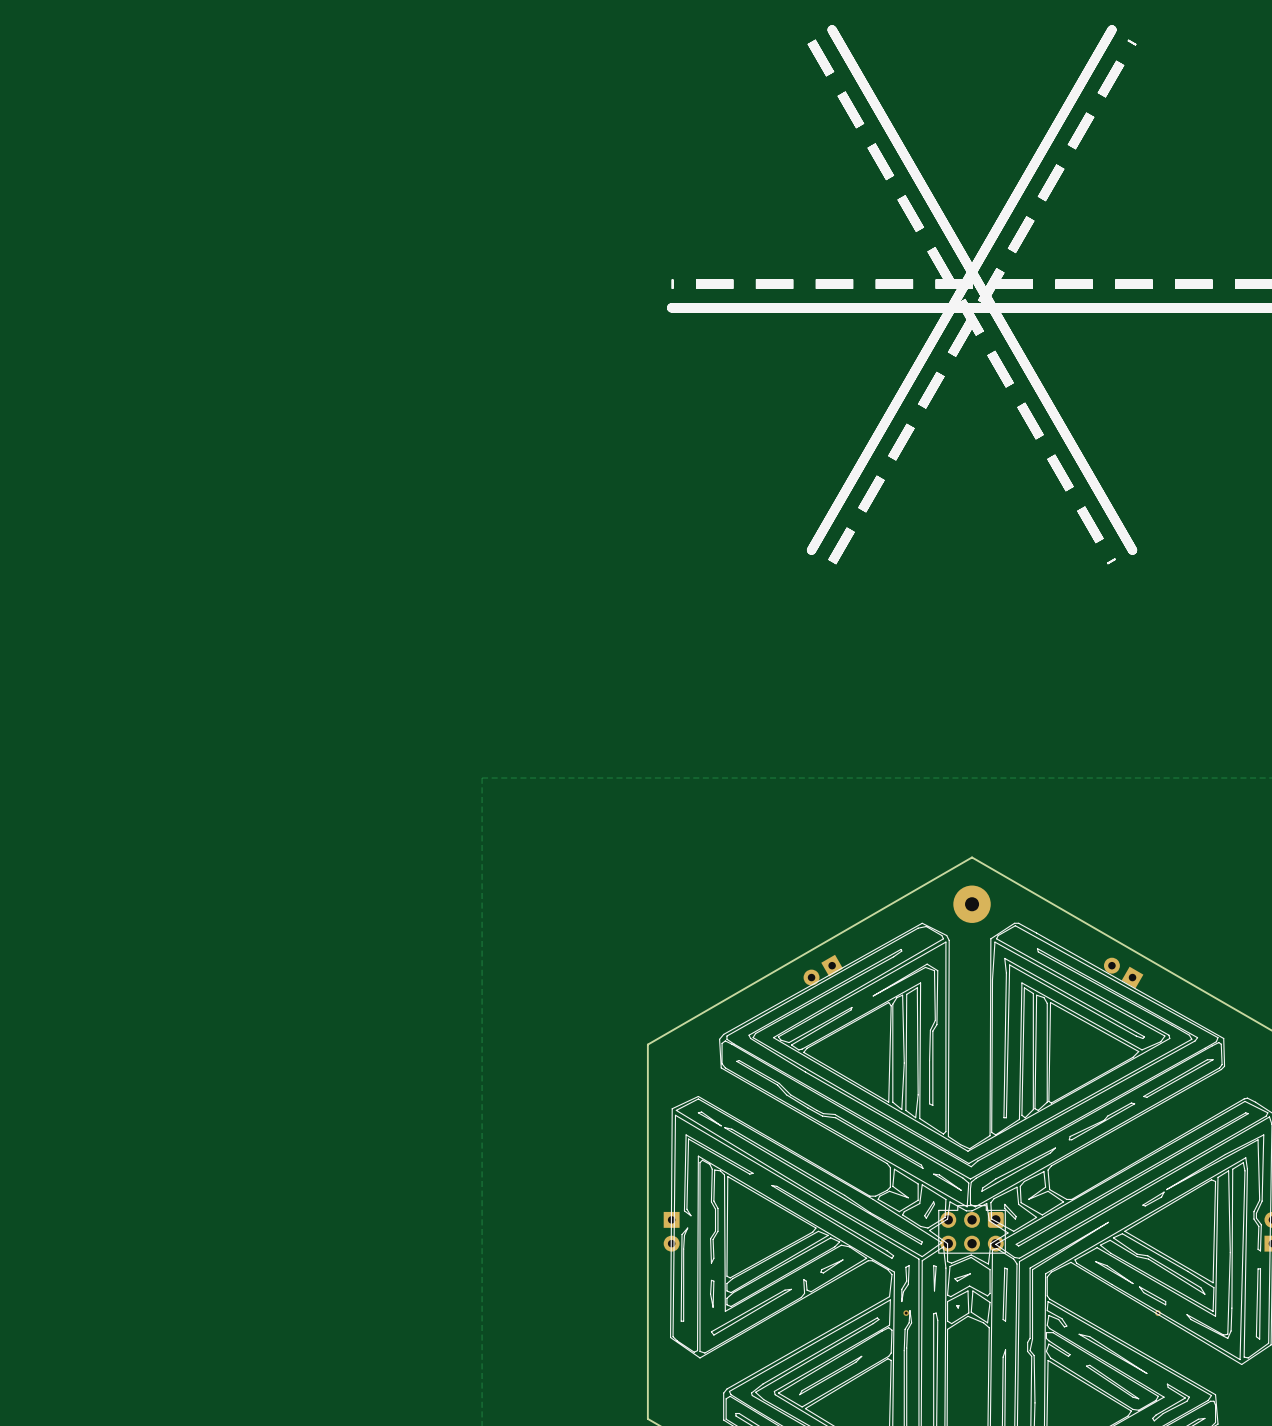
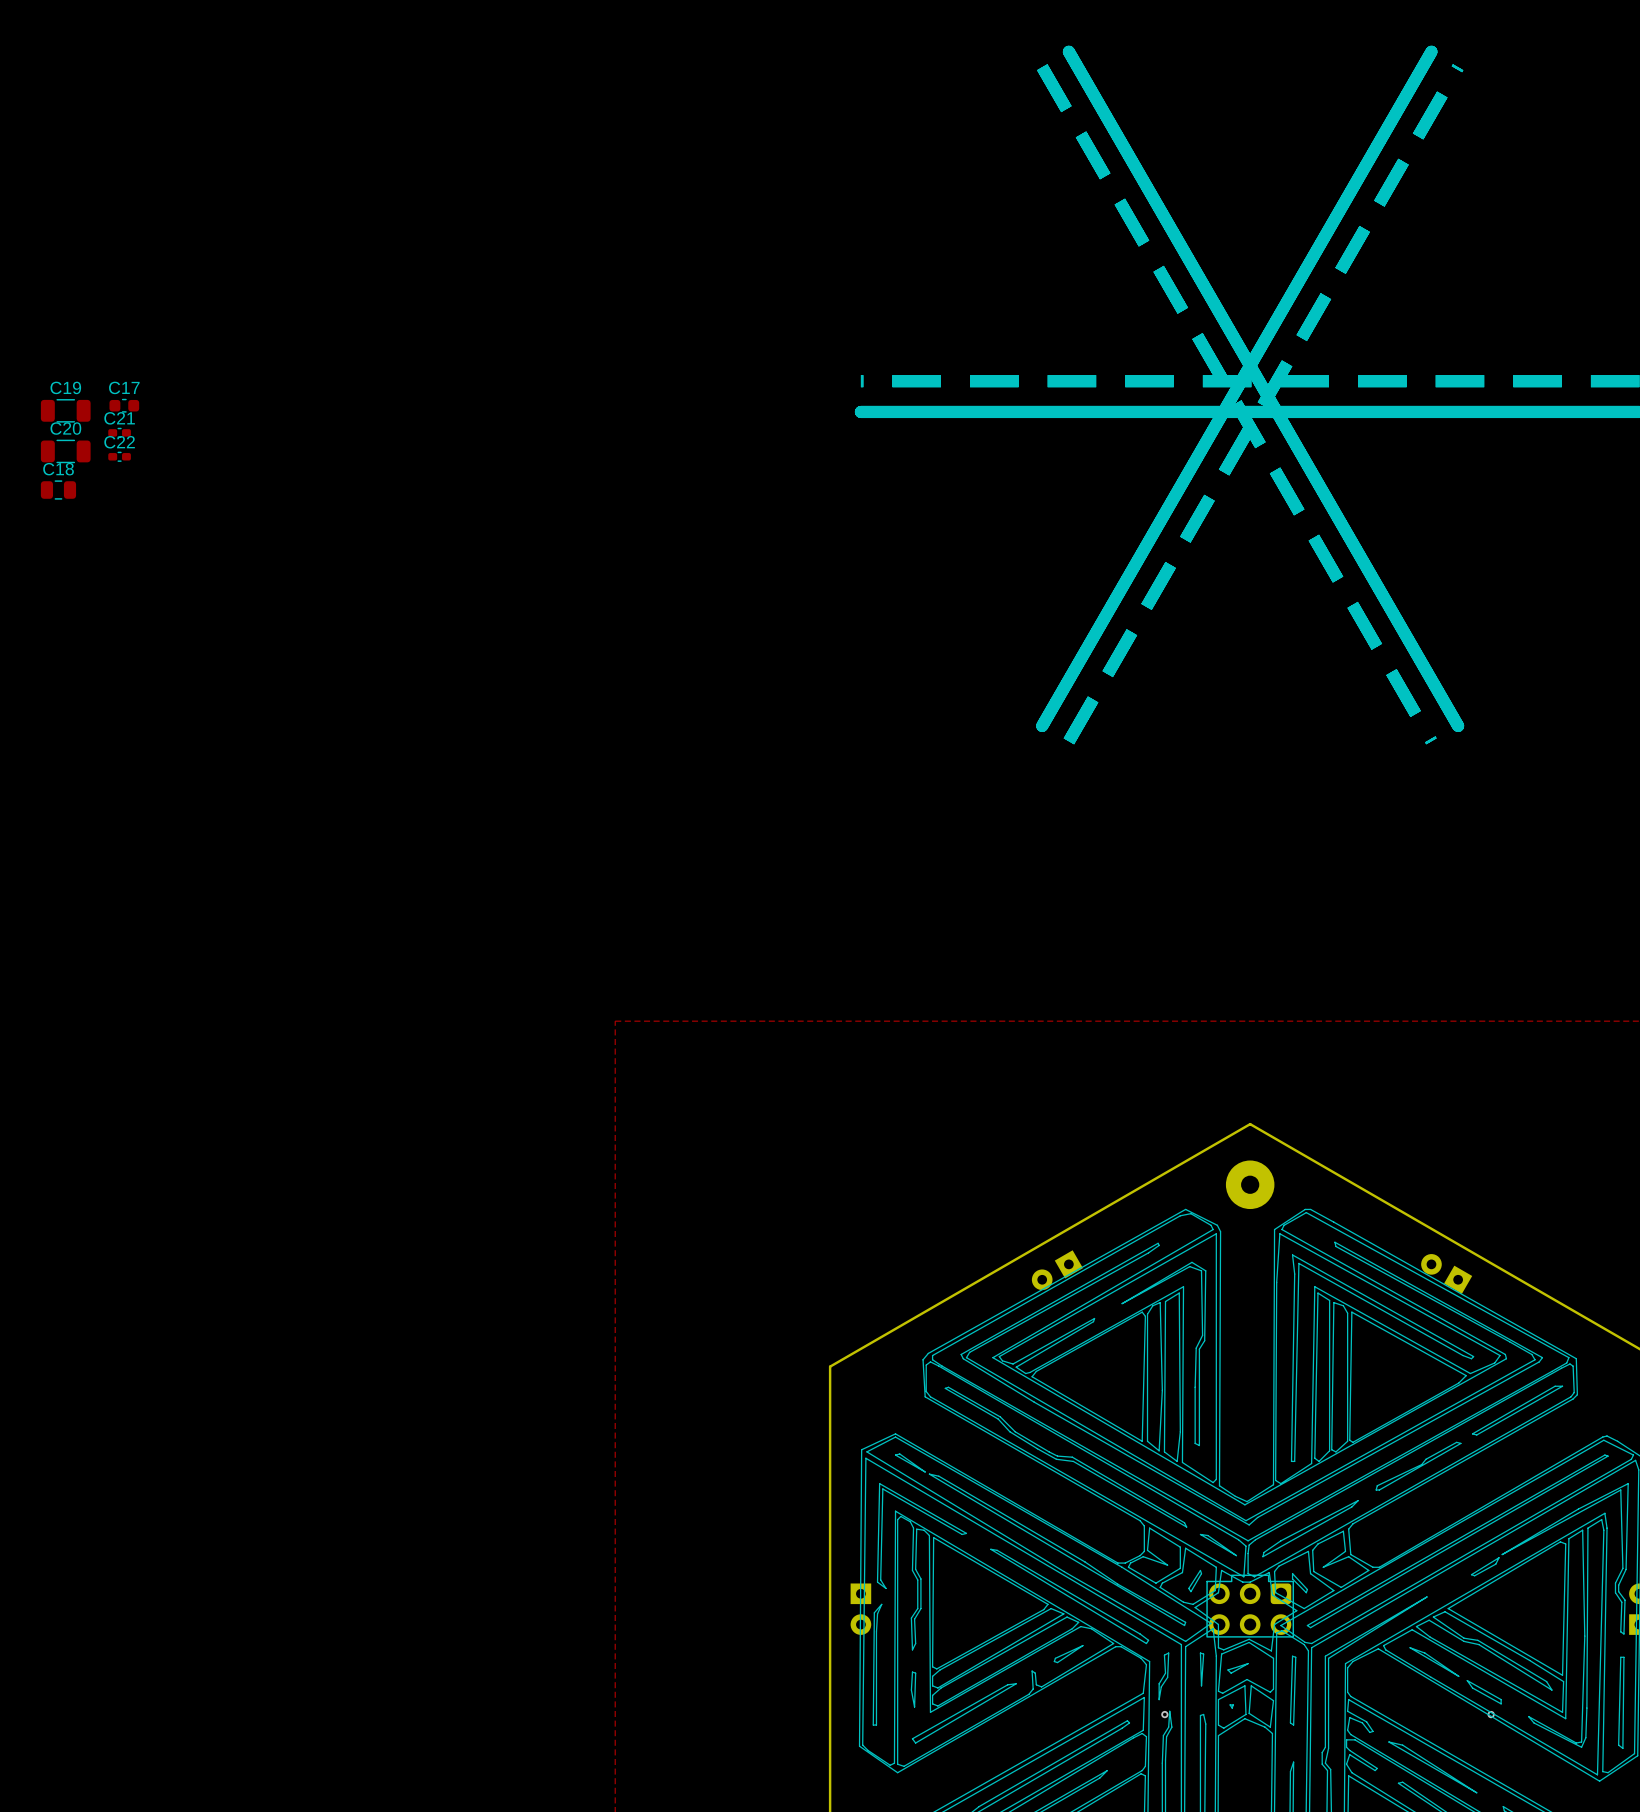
C17: none -> (124, 405)
C19: none -> (65, 410)
C21: none -> (119, 432)
C20: none -> (65, 451)
C22: none -> (119, 456)
C18: none -> (58, 490)

